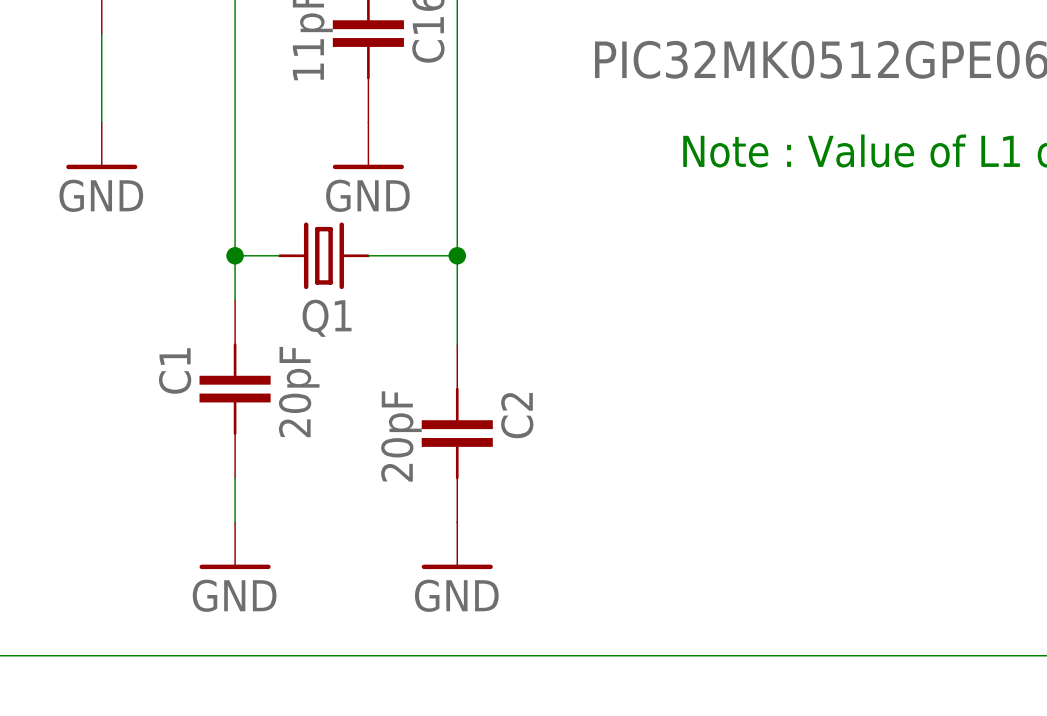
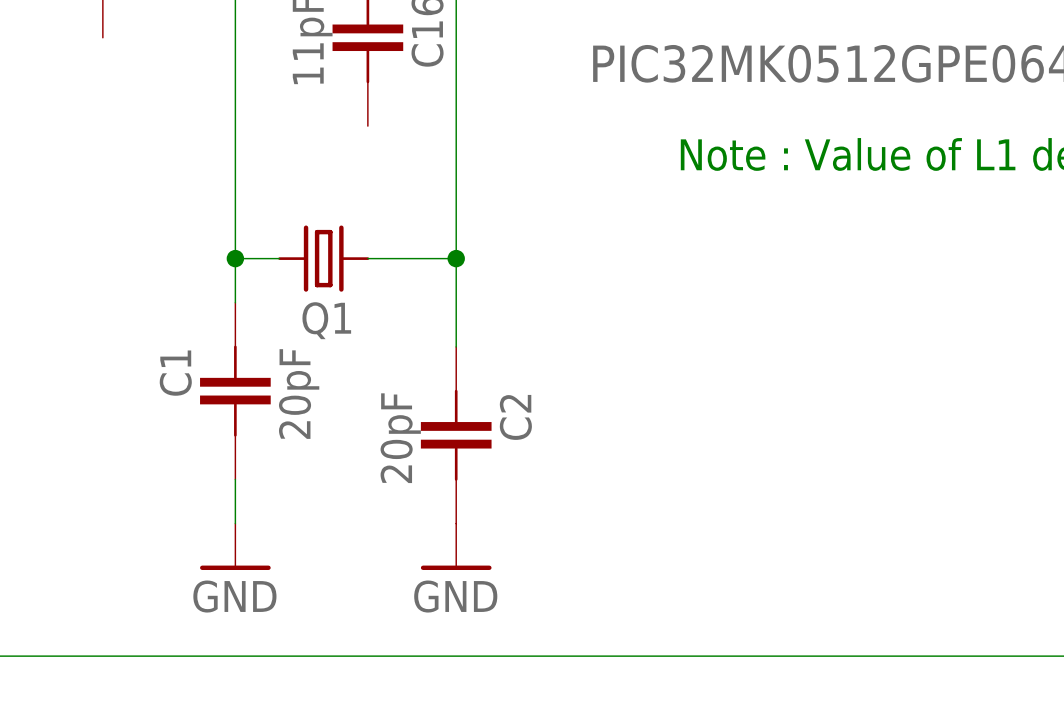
wire: (101, 33) (101, 122) -> none
power symbol: GND (101, 145) -> none
power symbol: GND (368, 145) -> none

